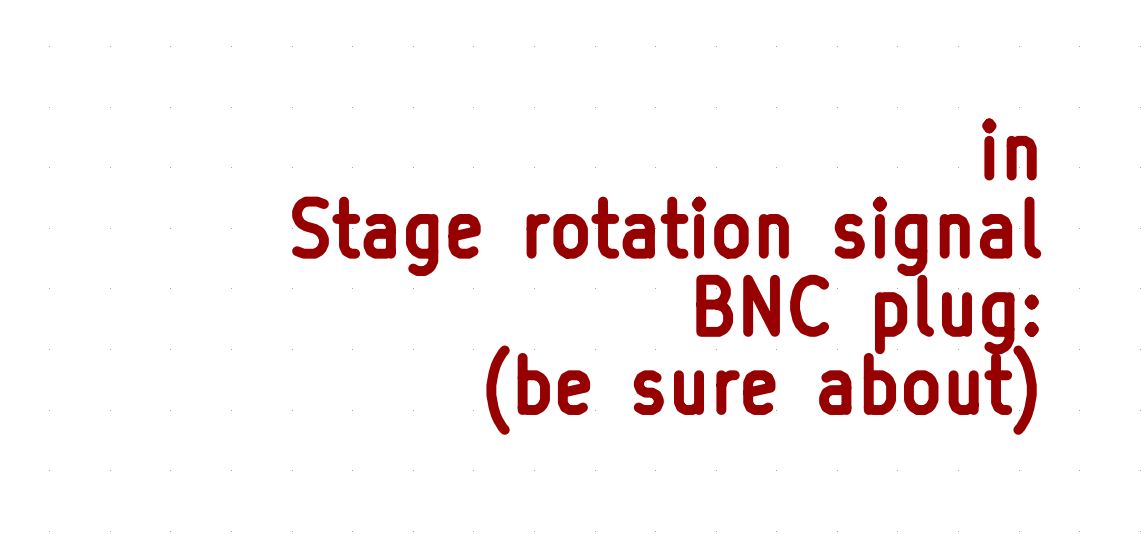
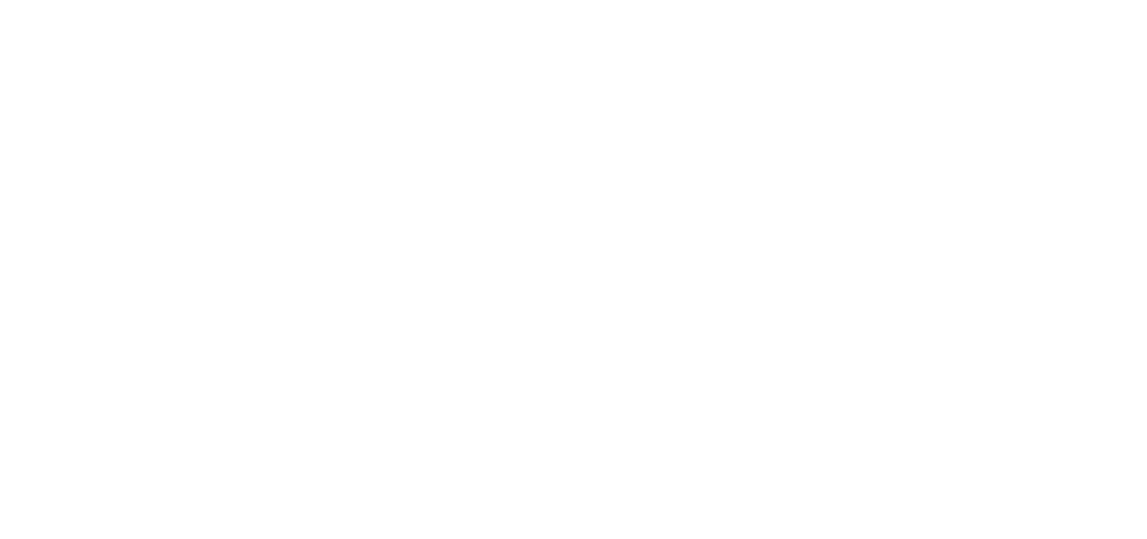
text: in (1009, 149) -> none
text: Stage rotation signal (666, 236) -> none
text: BNC plug: (867, 314) -> none
text: (be sure about) (761, 390) -> none

